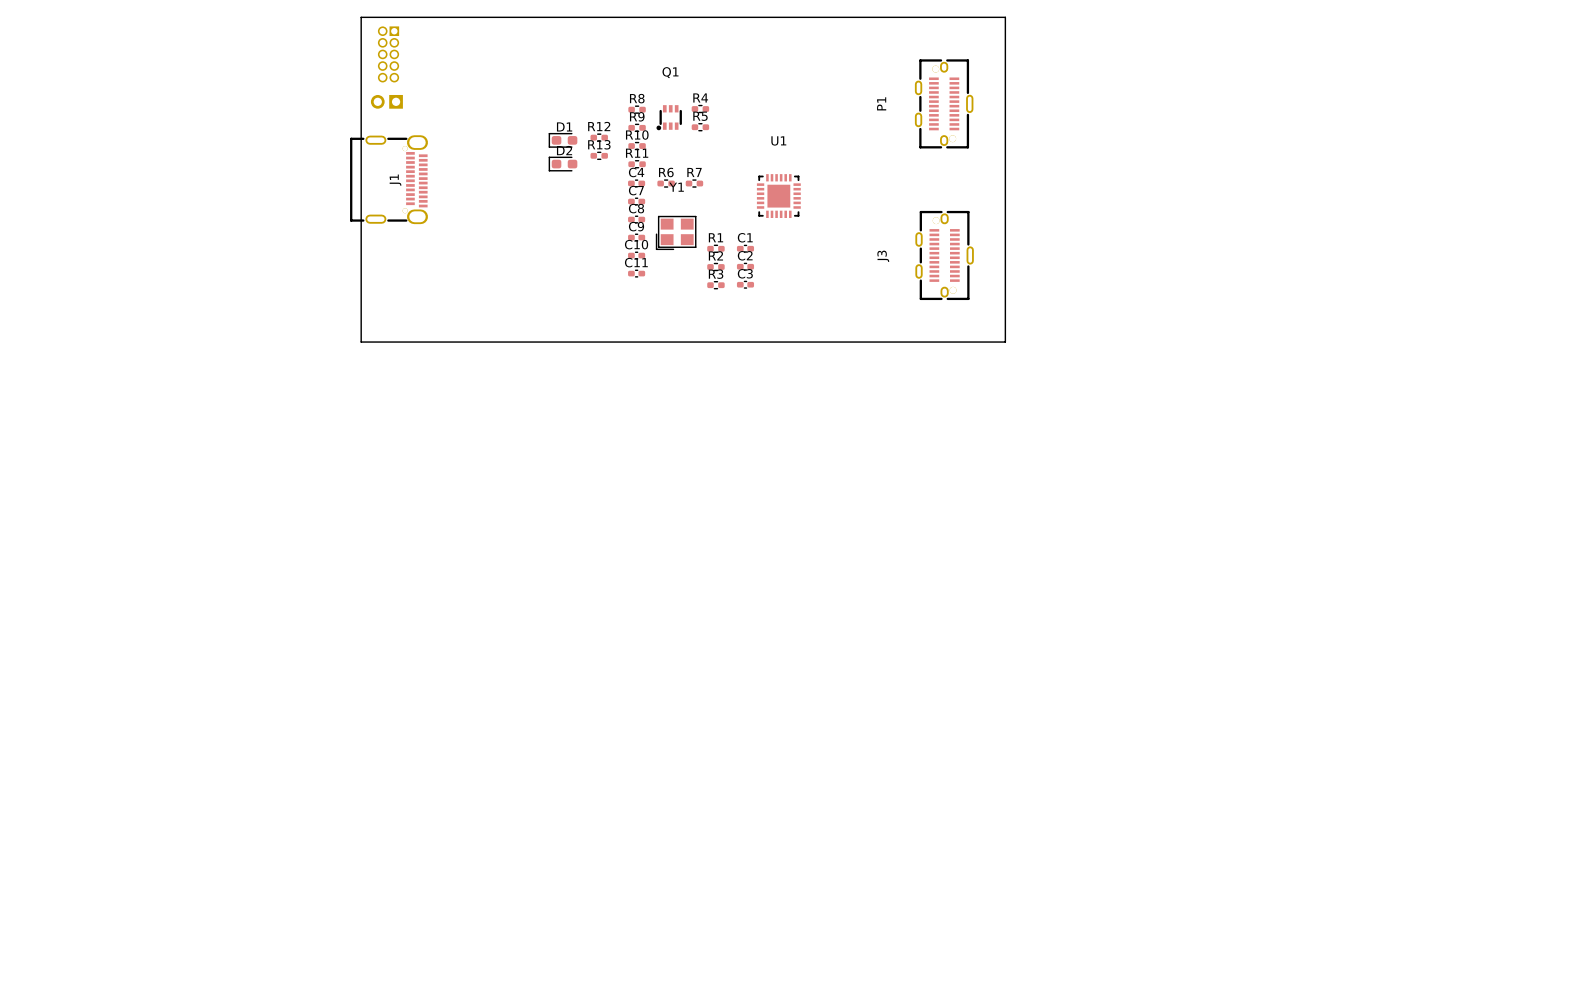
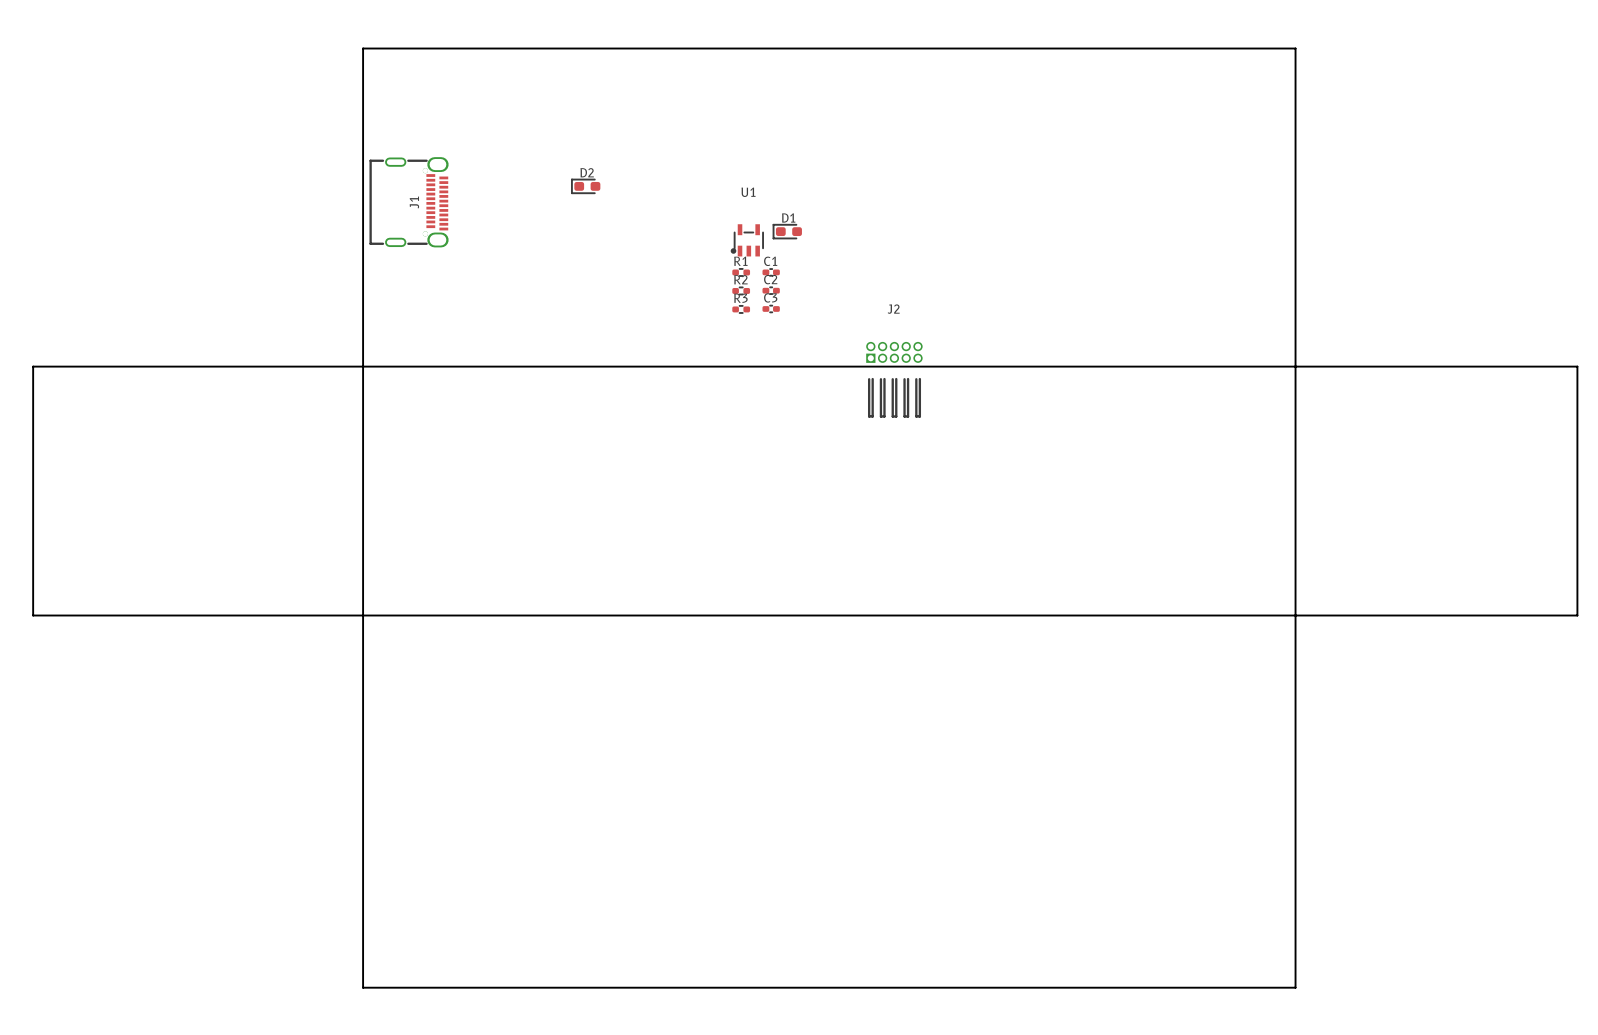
board edge: (361, 17) (1005, 17) (1005, 342) (361, 342) (361, 17) -> none
board edge: none -> (363, 48) (1295, 48) (1295, 987) (363, 987) (363, 48)
part: (388, 54) -> none
part: (386, 101) -> none
P1: (944, 103) -> none
R8: (637, 109) -> none
R4: (700, 109) -> none
Q1: (669, 117) -> none
R9: (637, 127) -> none
R5: (700, 127) -> none
R12: (599, 137) -> none
D1 position: (563, 140) -> (787, 231)
R10: (637, 146) -> none
R13: (599, 155) -> none
R11: (637, 164) -> none
U1 footprint: [756, 174, 801, 218] -> [730, 224, 764, 257]
C4: (636, 183) -> none
R6: (666, 183) -> none
R7: (694, 183) -> none
C7: (636, 201) -> none
C8: (636, 219) -> none
Y1: (676, 232) -> none
C9: (636, 237) -> none
C10: (636, 255) -> none
J3: (944, 255) -> none
C11: (636, 273) -> none
board edge: none -> (33, 366) (1577, 366) (1577, 615) (33, 615) (33, 366)
J2: none -> (894, 379)

